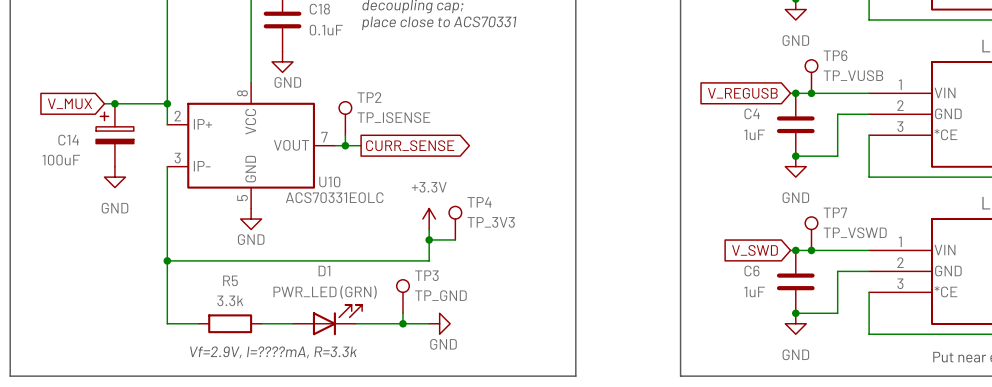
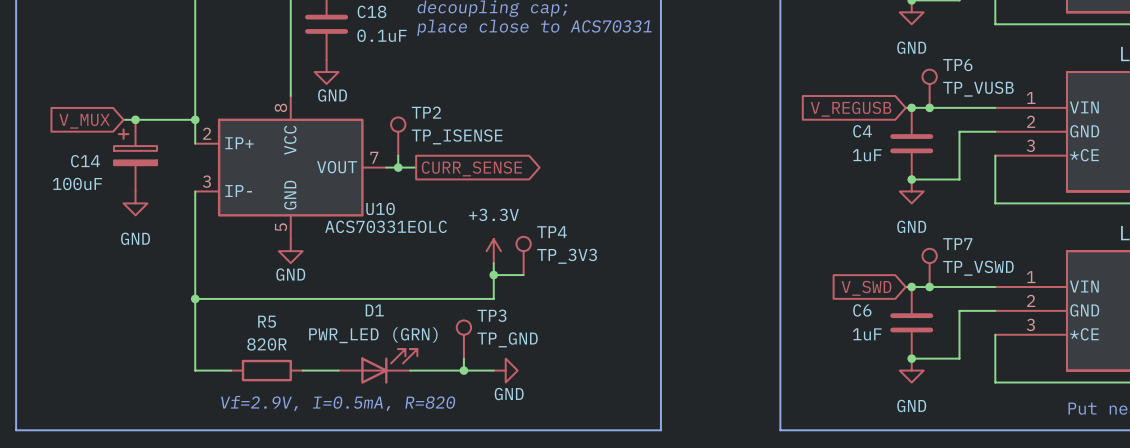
R5 value: 3.3k (230, 300) -> 820R (266, 344)
text: Vf=2.9V, I=????mA, R=3.3k (273, 352) -> Vf=2.9V, I=0.5mA, R=820 (338, 403)

